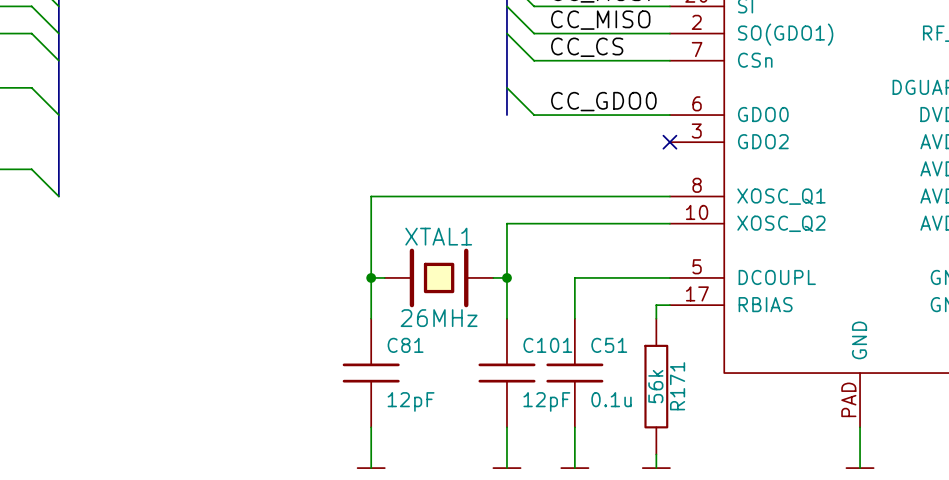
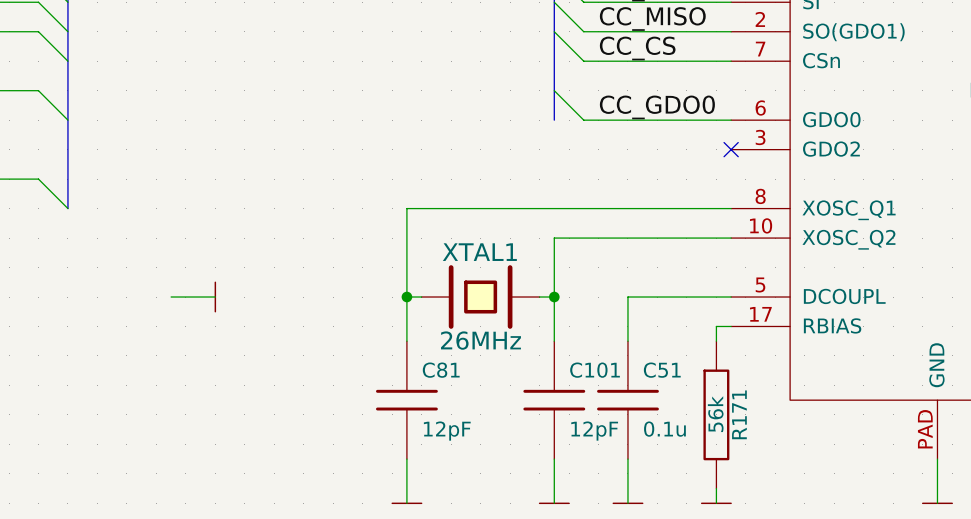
wire: none -> (171, 297) (215, 297)
power symbol: none -> (215, 297)

